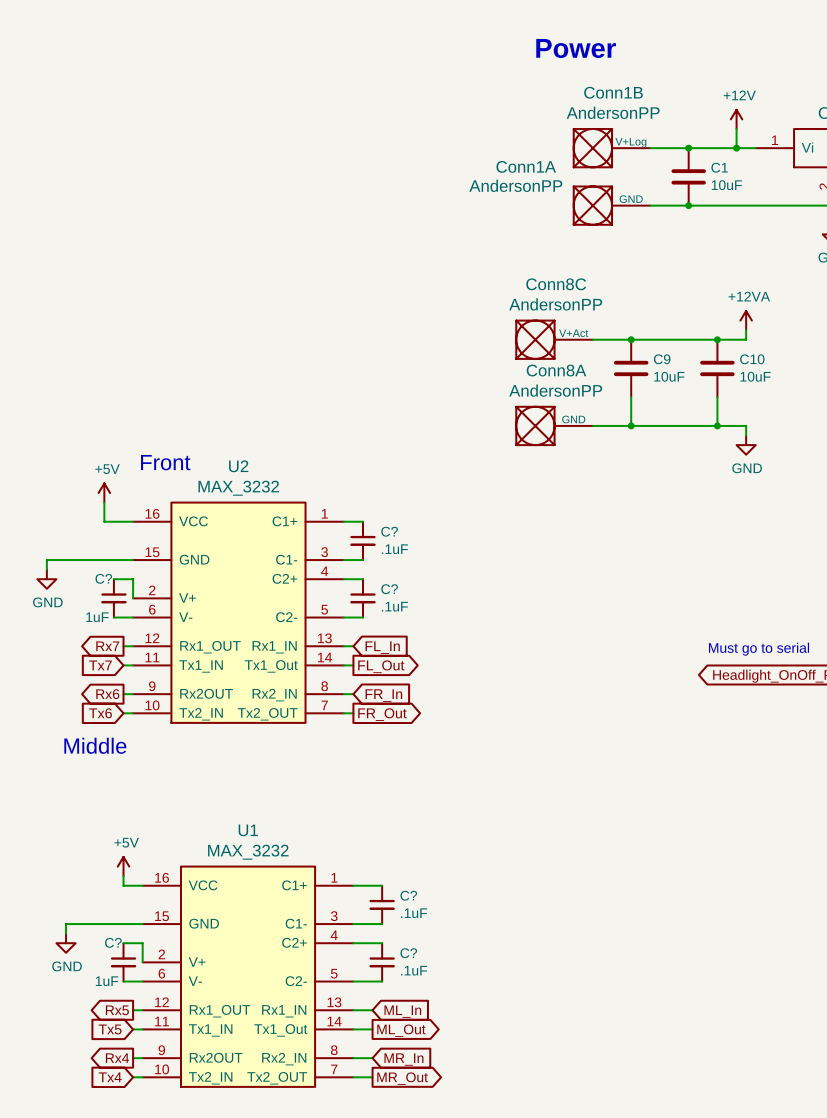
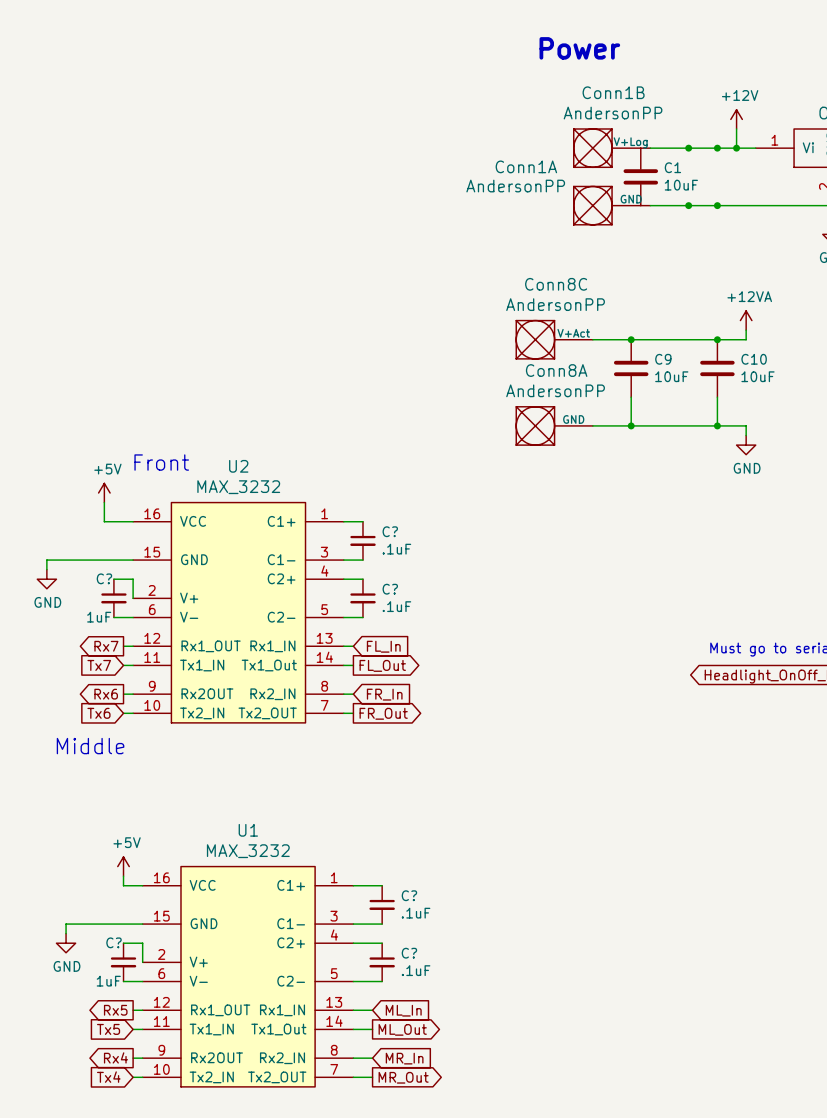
junction: none -> (717, 148)
C1 position: (688, 176) -> (640, 176)
junction: none -> (717, 205)

